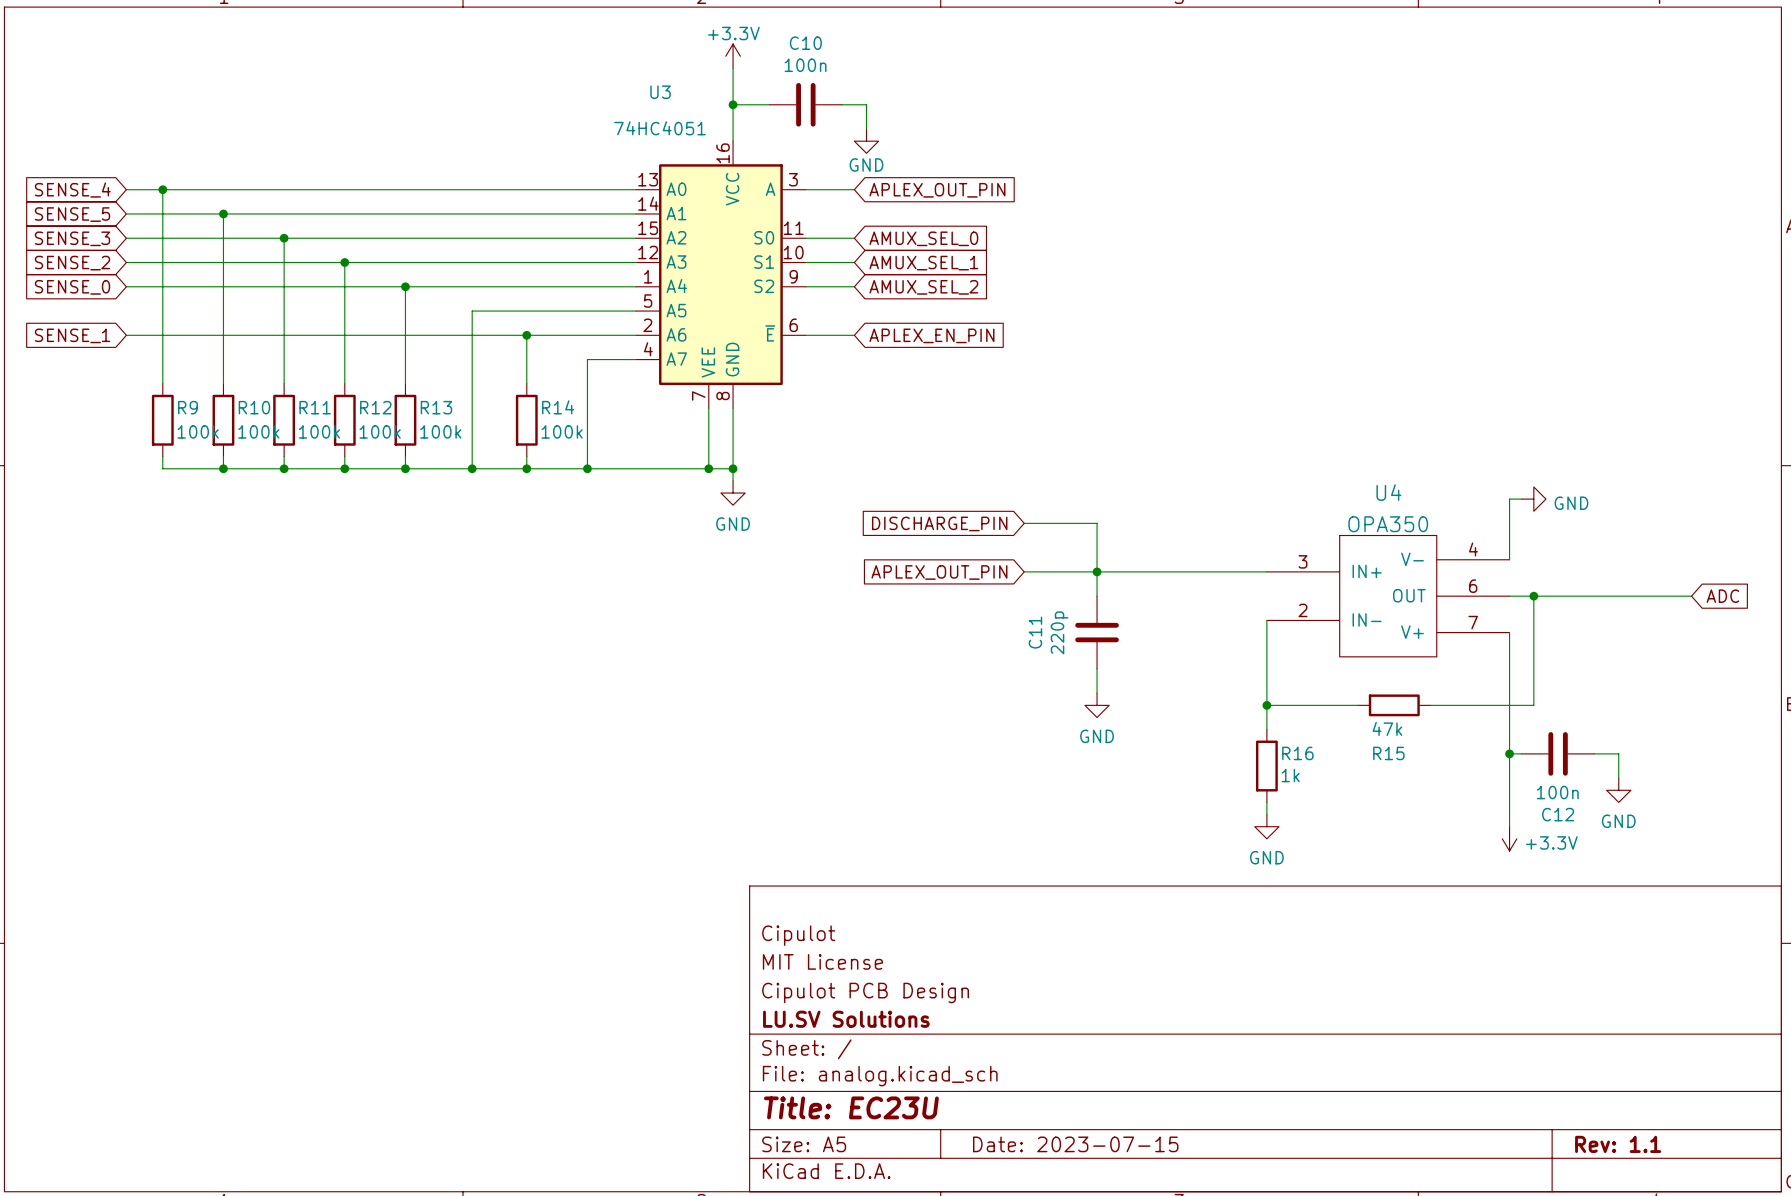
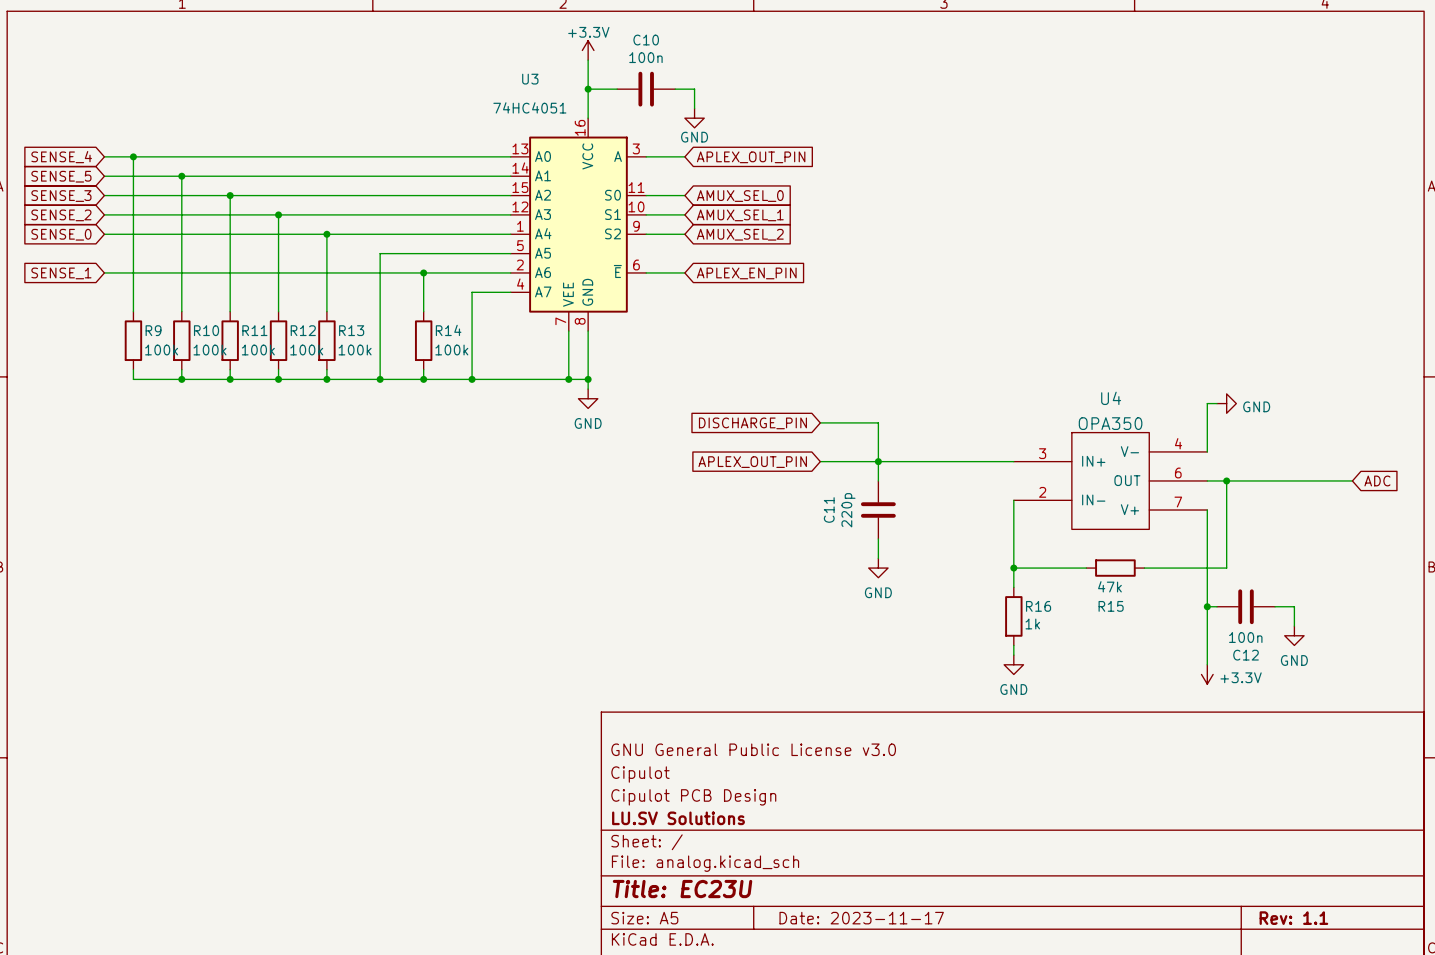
title block: Cipulot (798, 935) -> GNU General Public License v3.0 (753, 749)
title block: MIT License (822, 961) -> Cipulot (640, 774)
title block: Date: 2023-07-15 (1075, 1144) -> Date: 2023-11-17 (861, 918)

